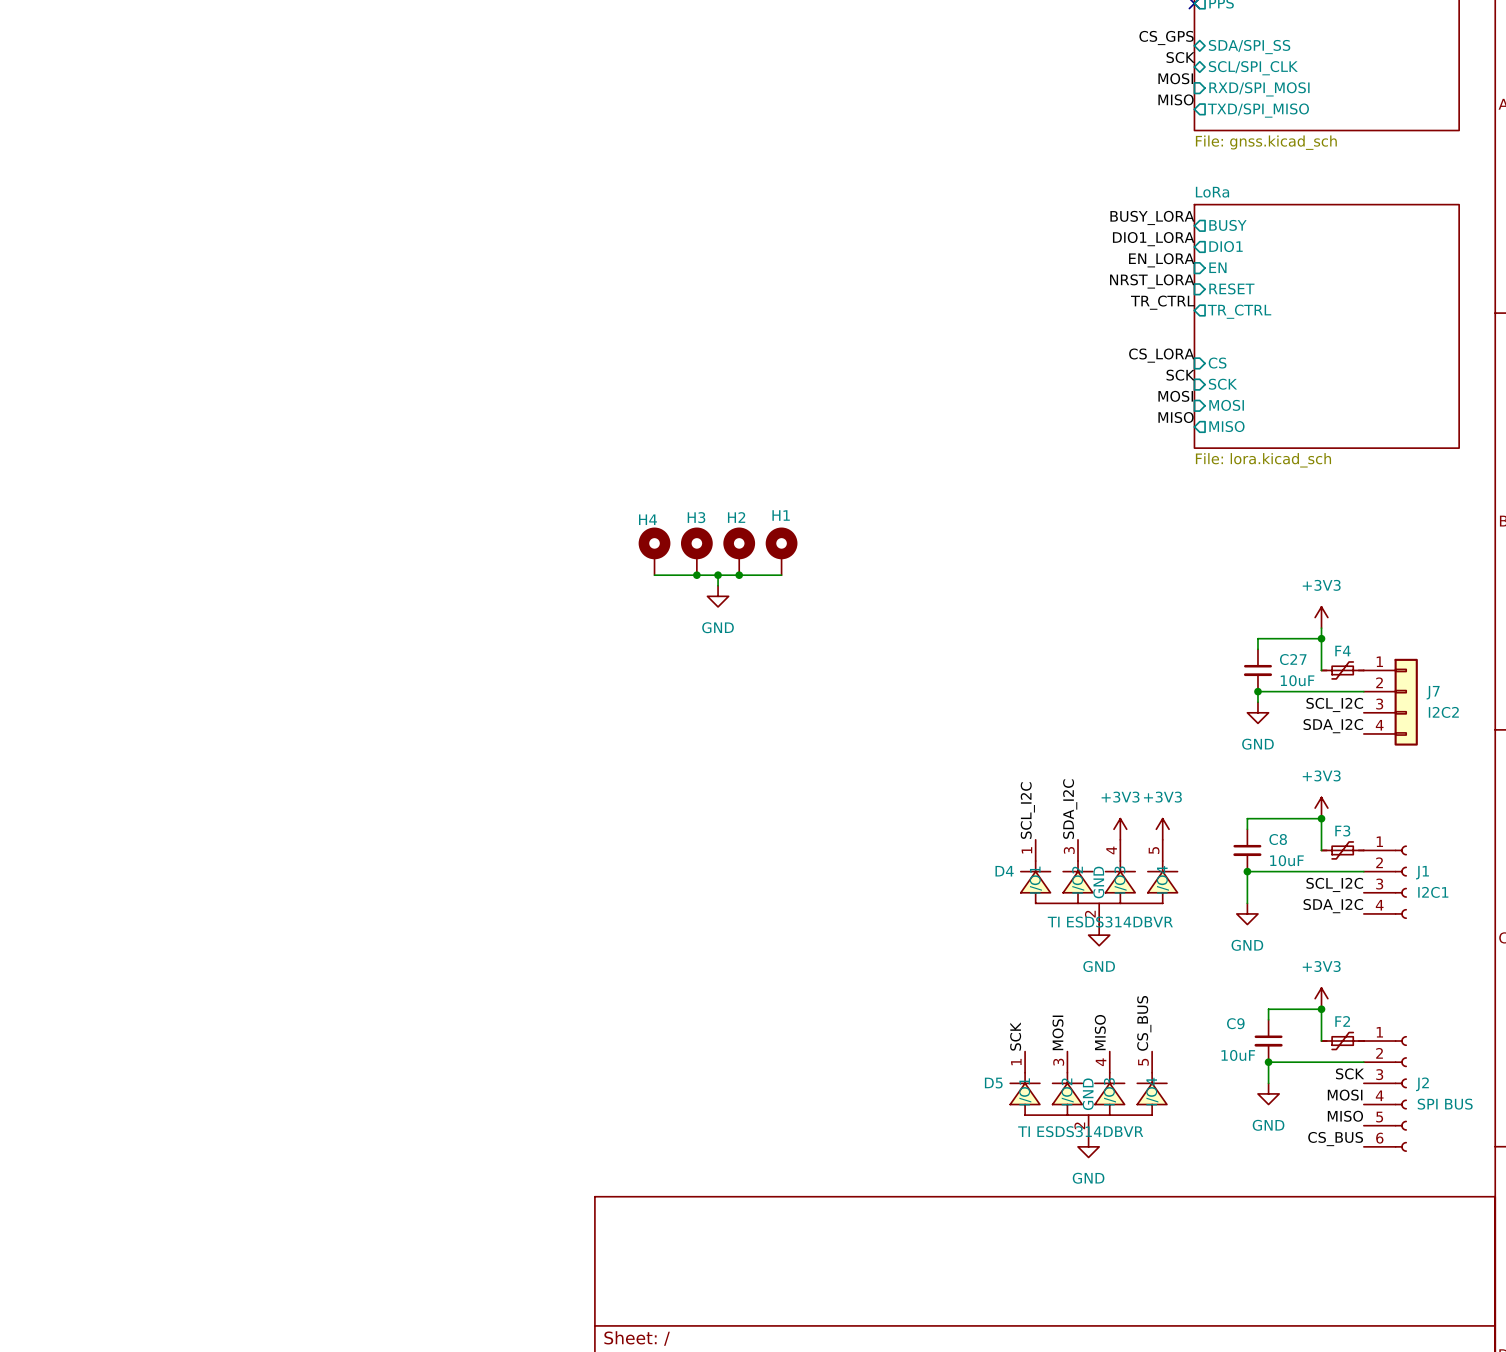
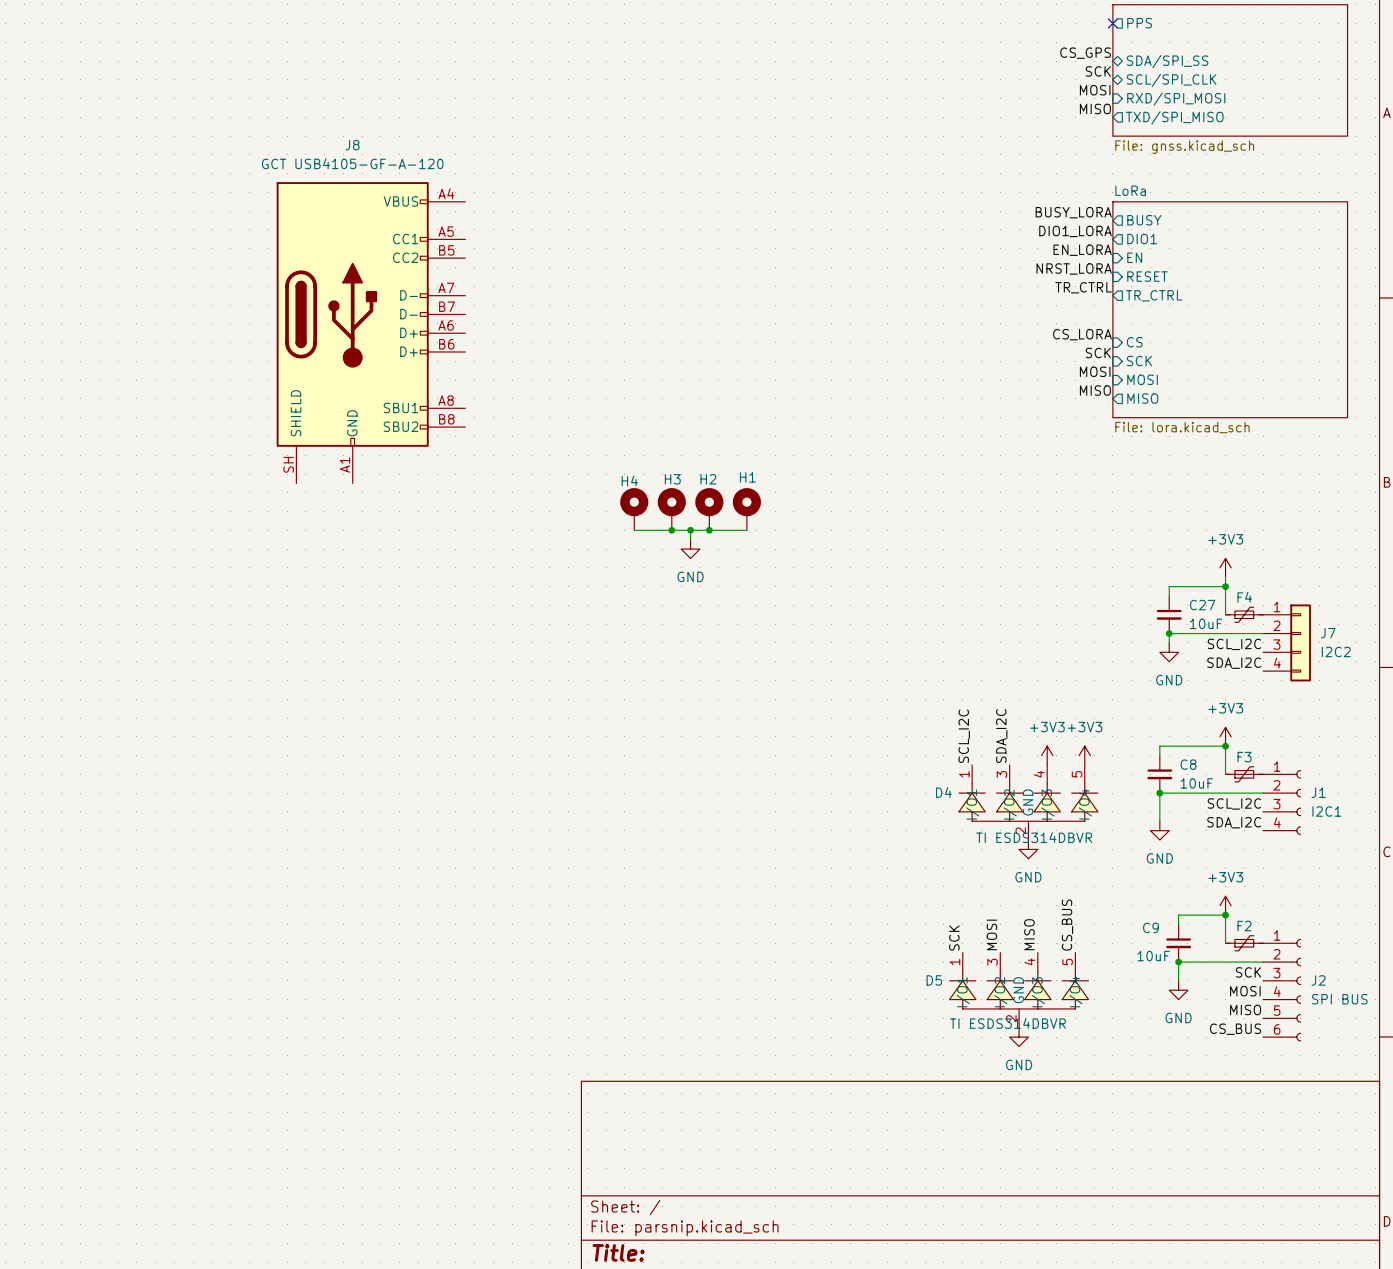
J8: none -> GCT USB4105-GF-A-120 (371, 332)

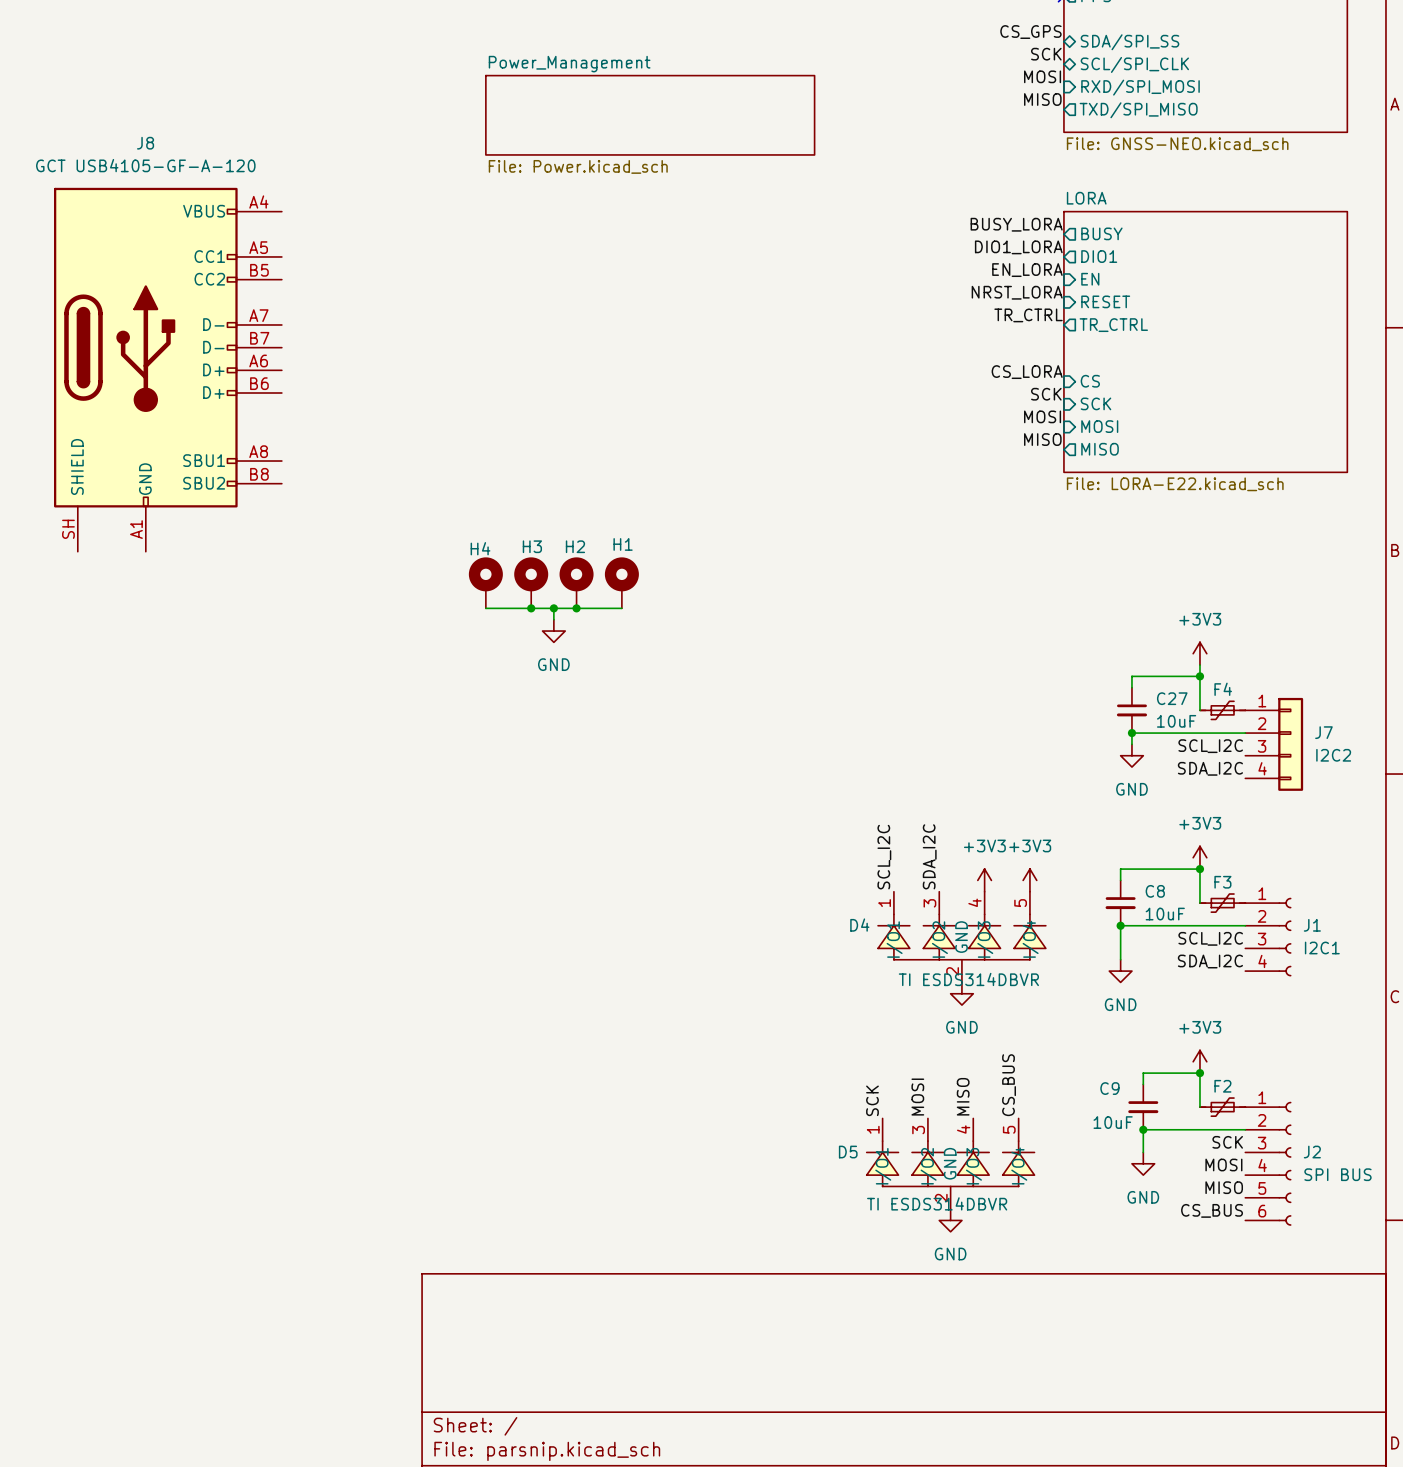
sheet Power_Management: none -> File: Power.kicad_sch (650, 115)
sheet value: File: gnss.kicad_sch (1184, 147) -> File: GNSS-NEO.kicad_sch (1177, 144)
sheet LoRa name: LoRa (1130, 190) -> LORA (1086, 198)
sheet LoRa value: File: lora.kicad_sch (1182, 427) -> File: LORA-E22.kicad_sch (1175, 484)

